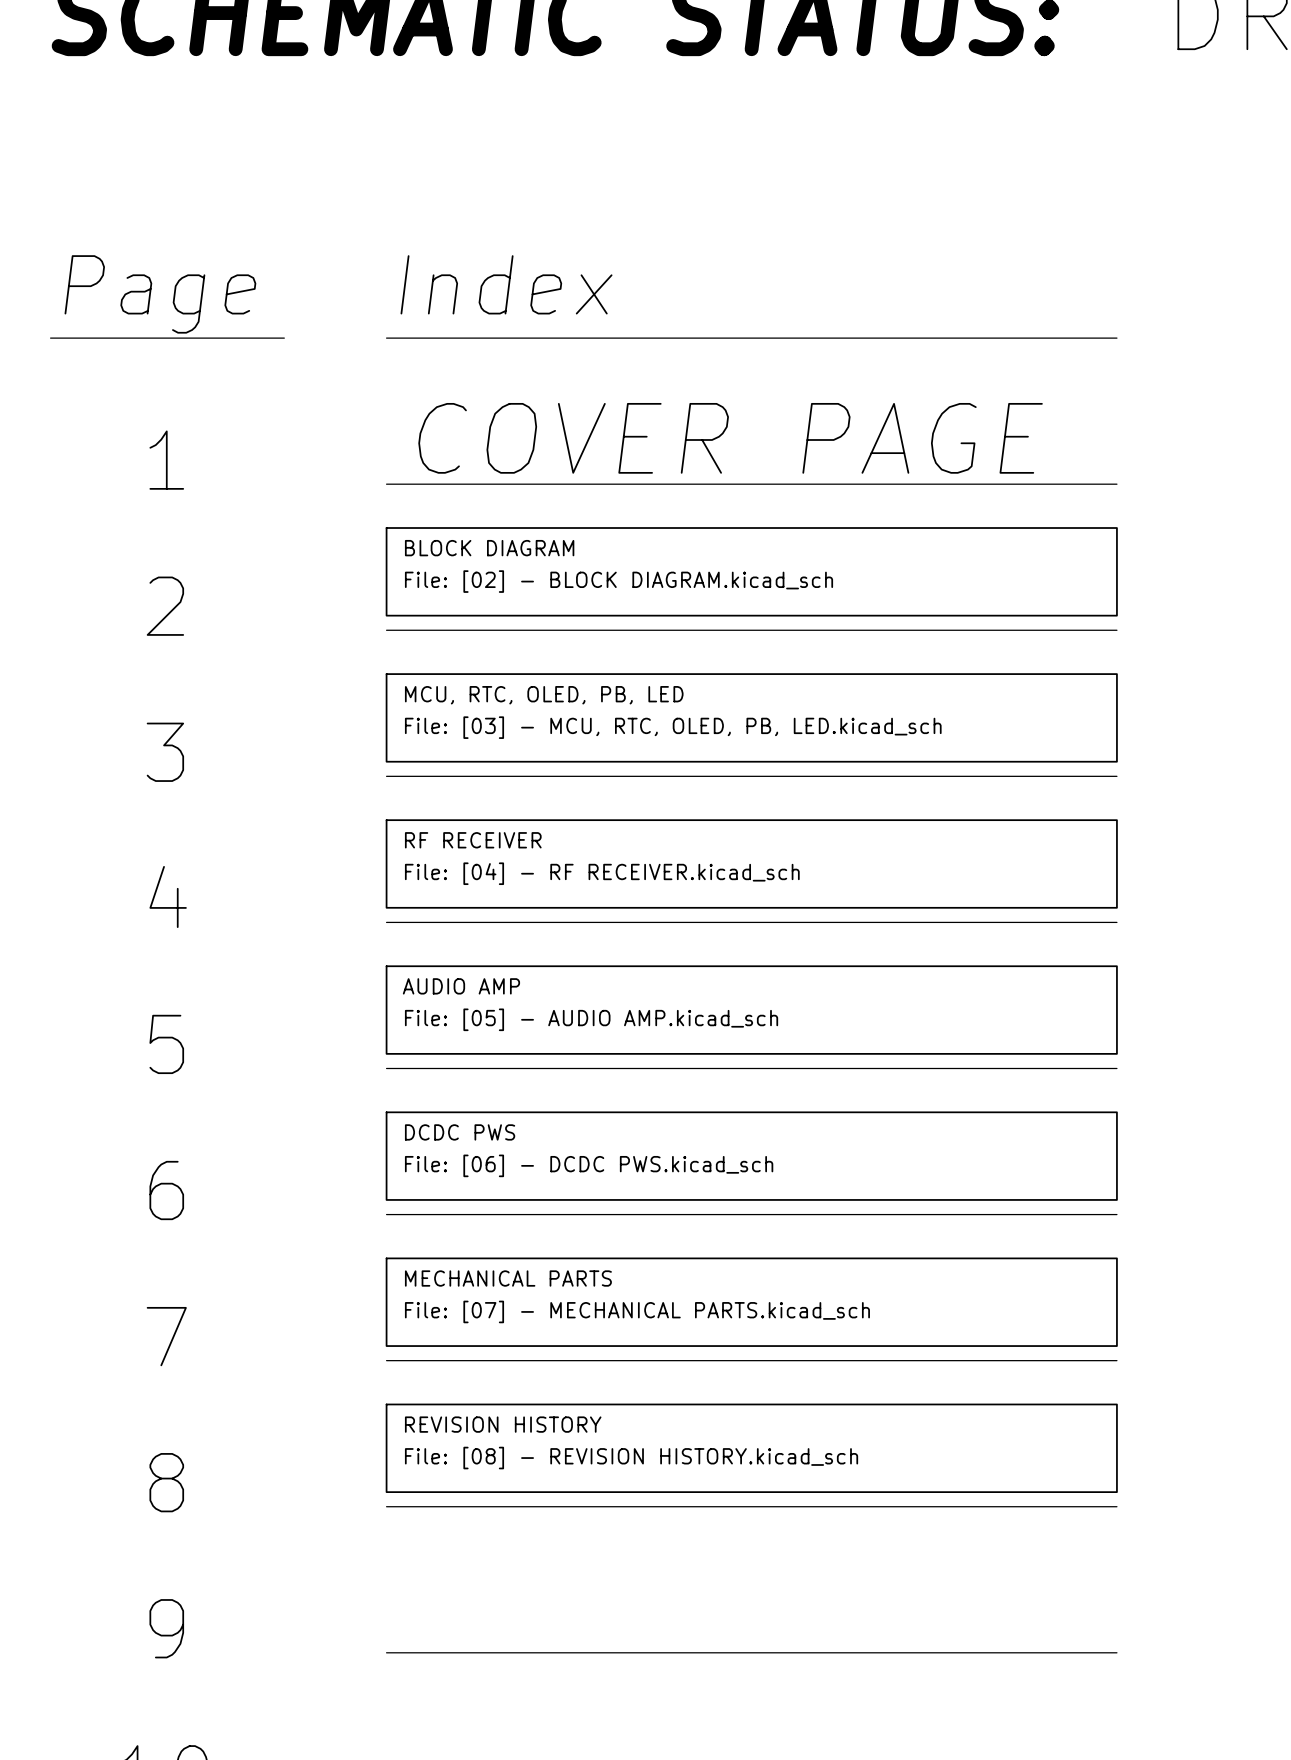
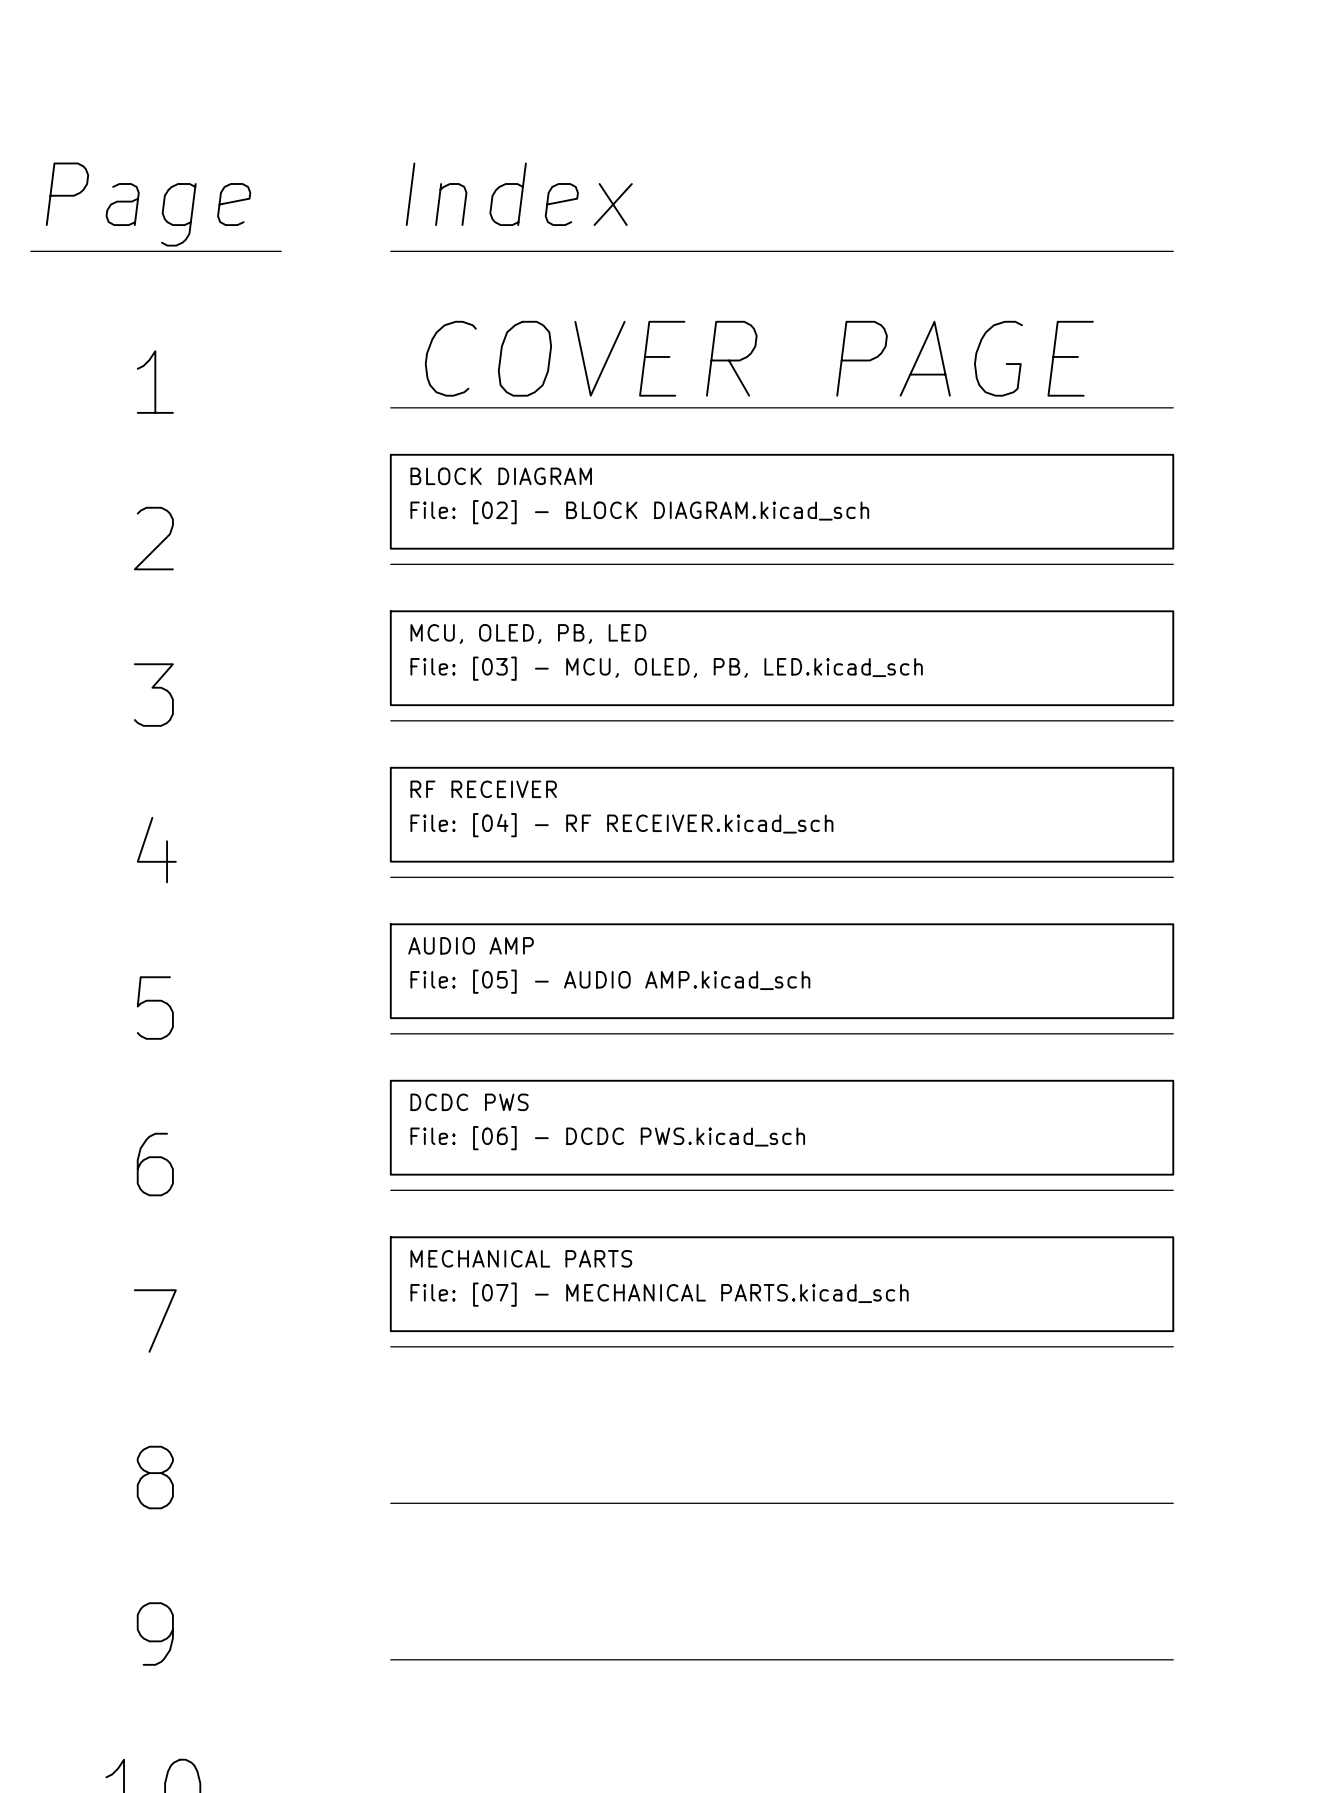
sheet MCU, RTC, OLED, PB, LED name: MCU, RTC, OLED, PB, LED (544, 695) -> MCU, OLED, PB, LED (528, 633)
sheet MCU, RTC, OLED, PB, LED value: File: [03] - MCU, RTC, OLED, PB, LED.kicad_sch (673, 727) -> File: [03] - MCU, OLED, PB, LED.kicad_sch (666, 668)
sheet REVISION HISTORY: File: [08] - REVISION HISTORY.kicad_sch (751, 1448) -> none

